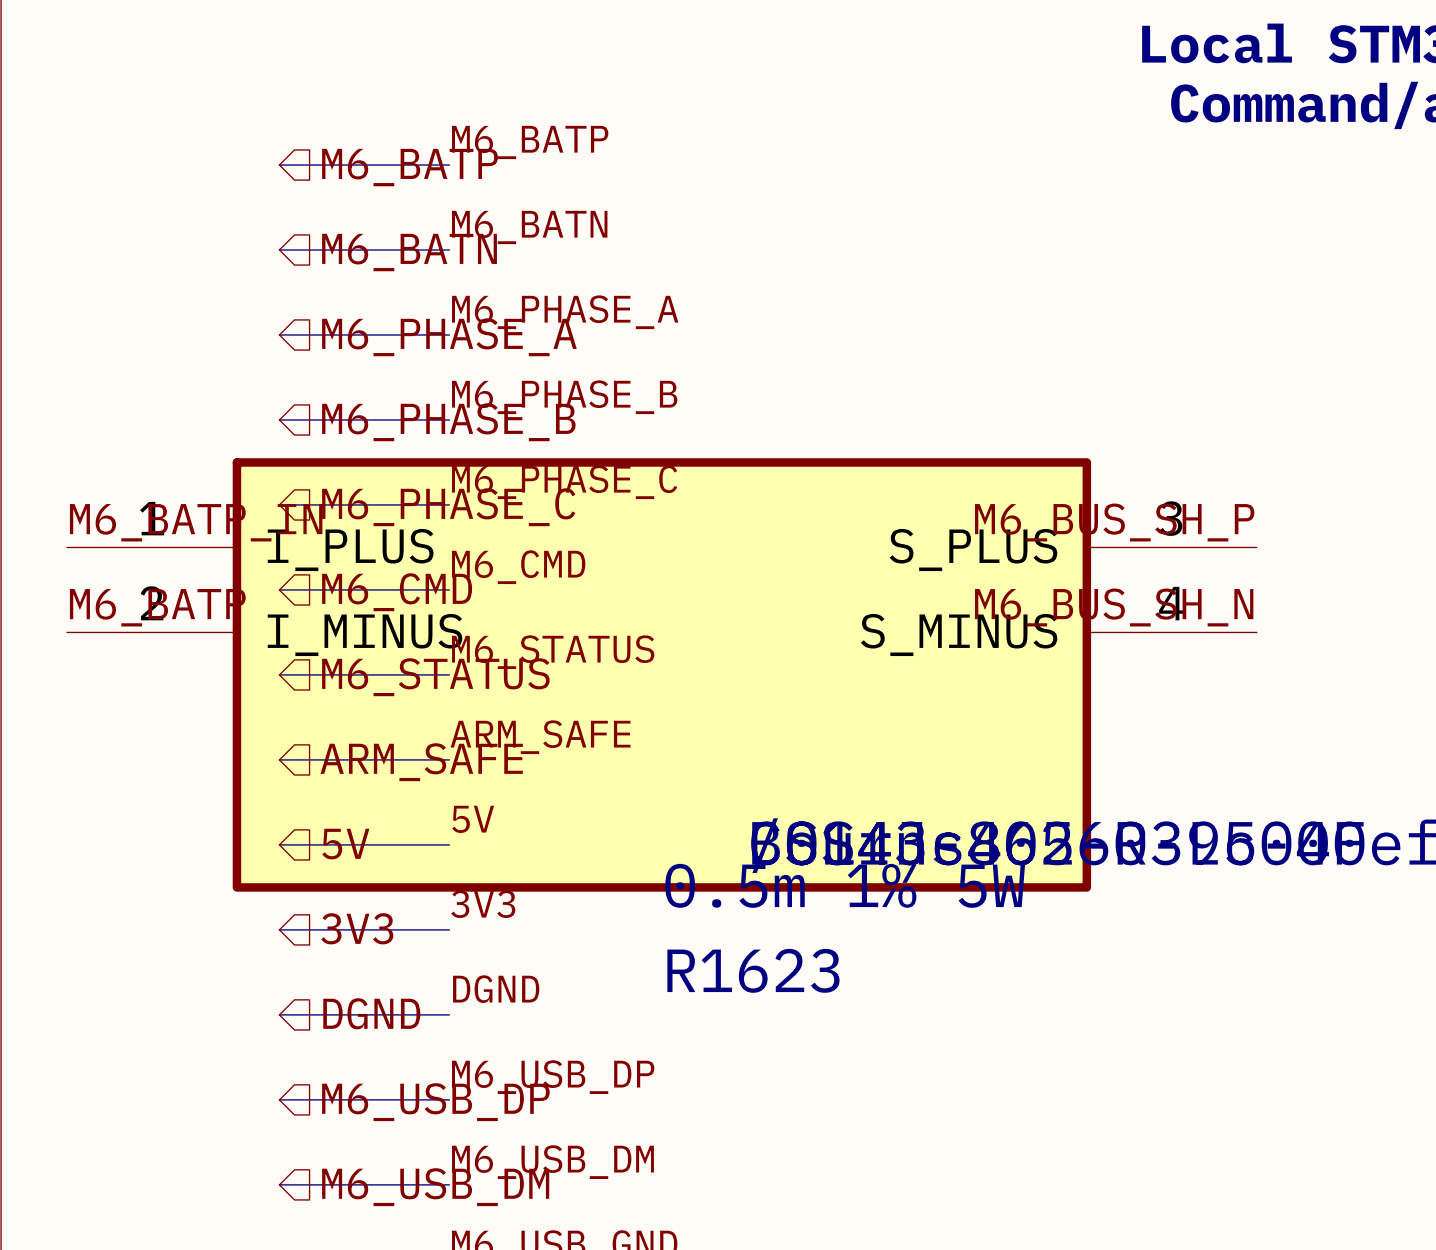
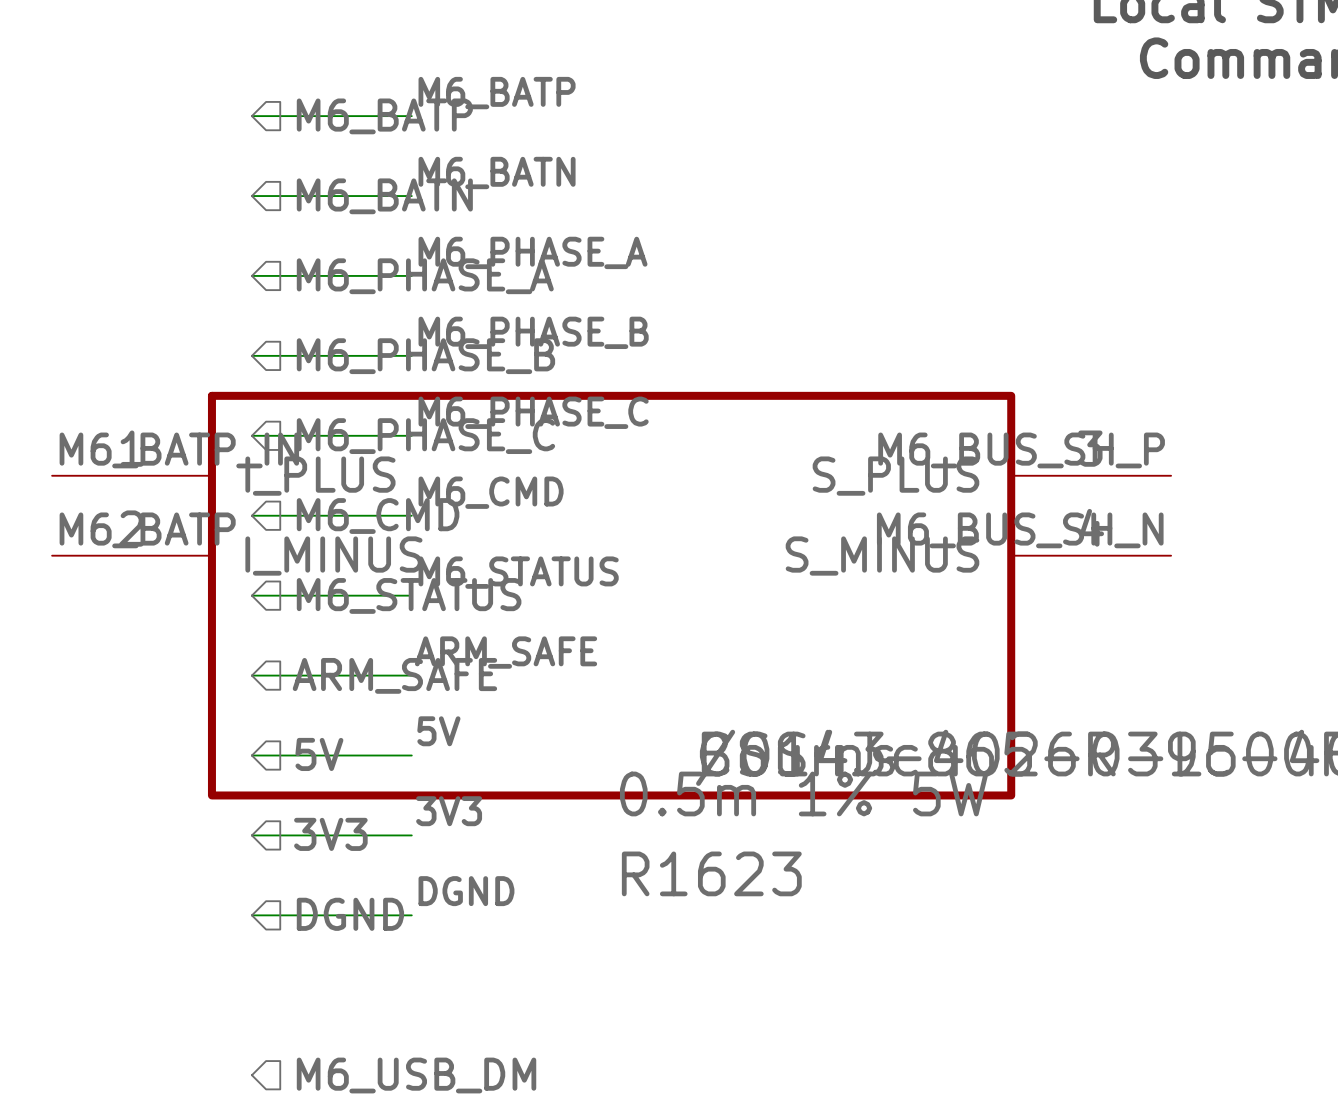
label: M6_USB_DP (553, 1077) -> none
wire: (279, 1099) (449, 1099) -> none
hierarchical label: M6_USB_DP (435, 1102) -> none
label: M6_USB_DM (552, 1162) -> none
wire: (279, 1184) (449, 1184) -> none

